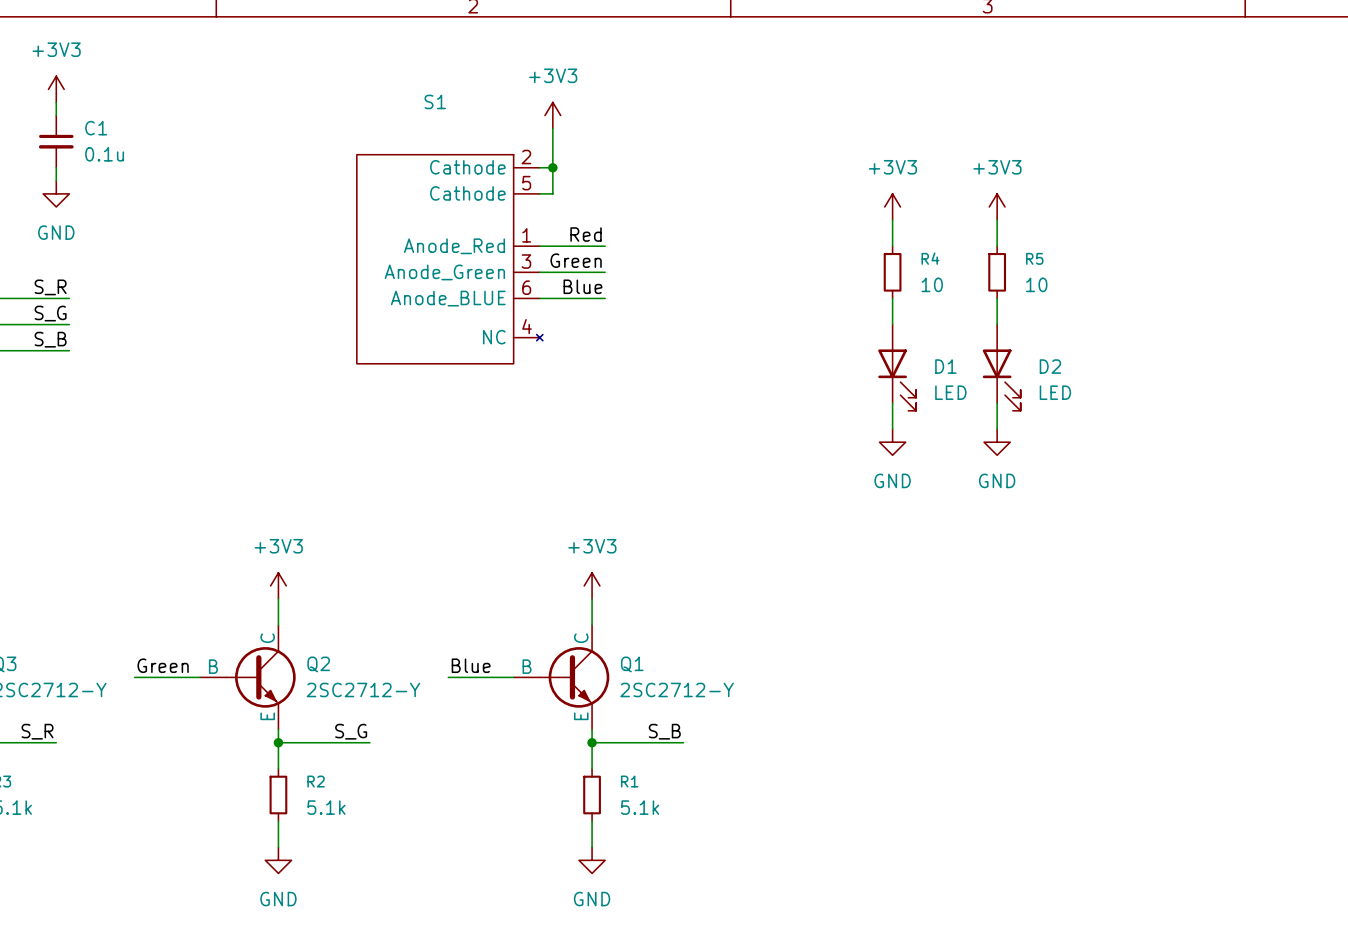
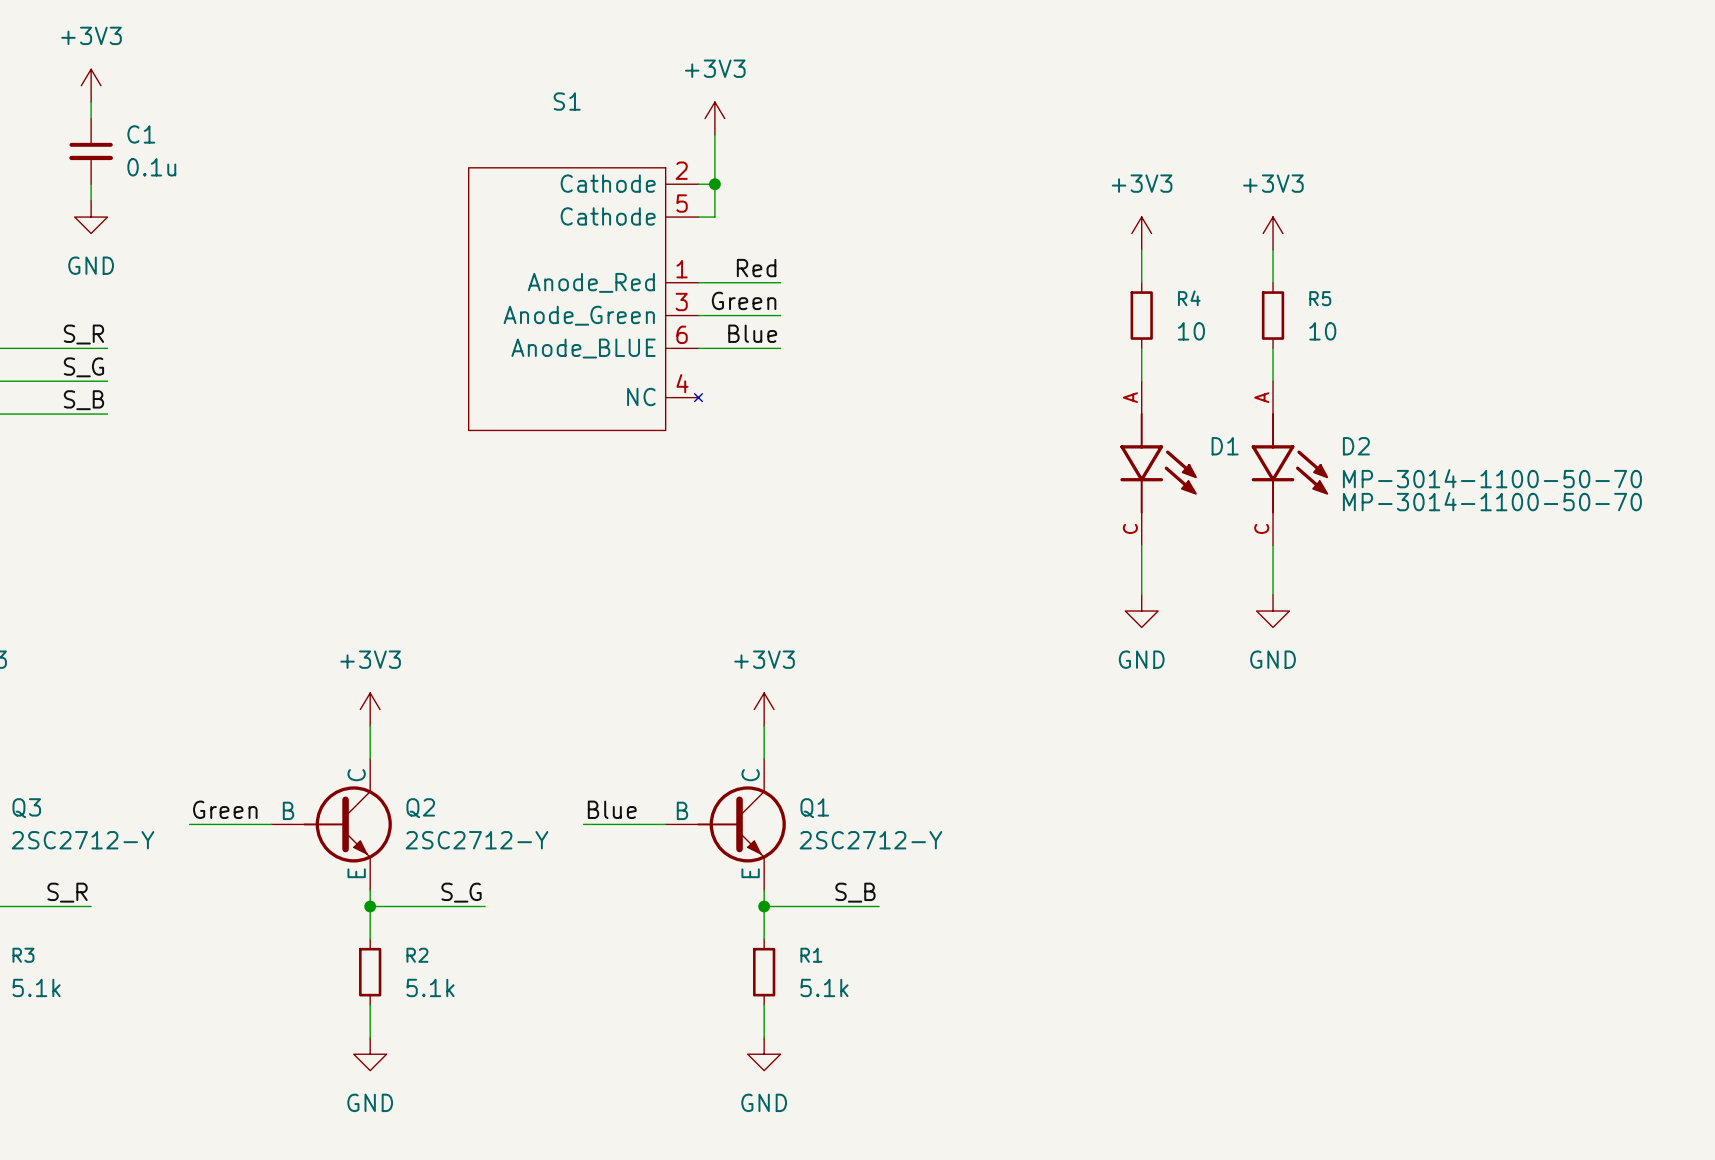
D1 symbol: [878, 324, 917, 411] -> [1120, 381, 1197, 546]
D2 symbol: [982, 324, 1021, 411] -> [1251, 381, 1329, 546]
D1 value: LED (950, 392) -> MP-3014-1100-50-70 (1492, 501)
D2 value: LED (1055, 392) -> MP-3014-1100-50-70 (1492, 478)
power symbol: GND (892, 442) -> none
power symbol: GND (997, 442) -> none
wire: none -> (1141, 545) (1141, 594)
wire: none -> (1273, 545) (1273, 594)
power symbol: none -> GND (1141, 611)
power symbol: none -> GND (1273, 611)

